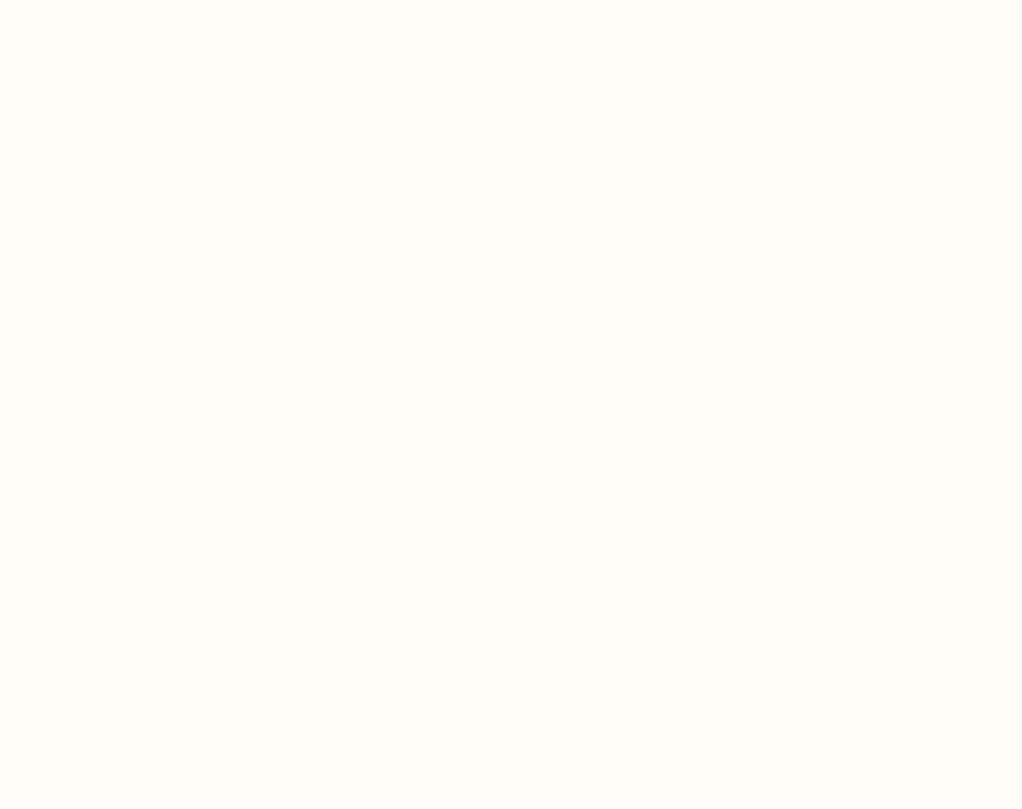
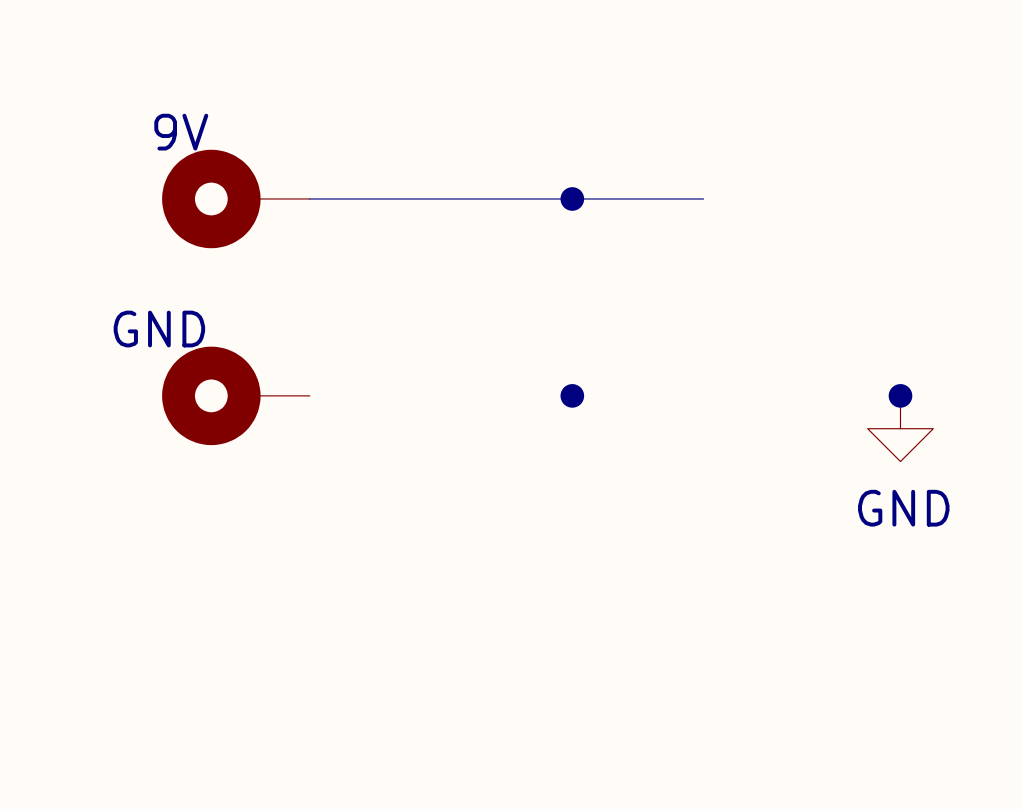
9V: none -> (235, 198)
wire: none -> (309, 198) (703, 198)
junction: none -> (572, 198)
GND: none -> (235, 395)
junction: none -> (572, 395)
junction: none -> (900, 395)
power symbol: none -> GND (900, 428)

